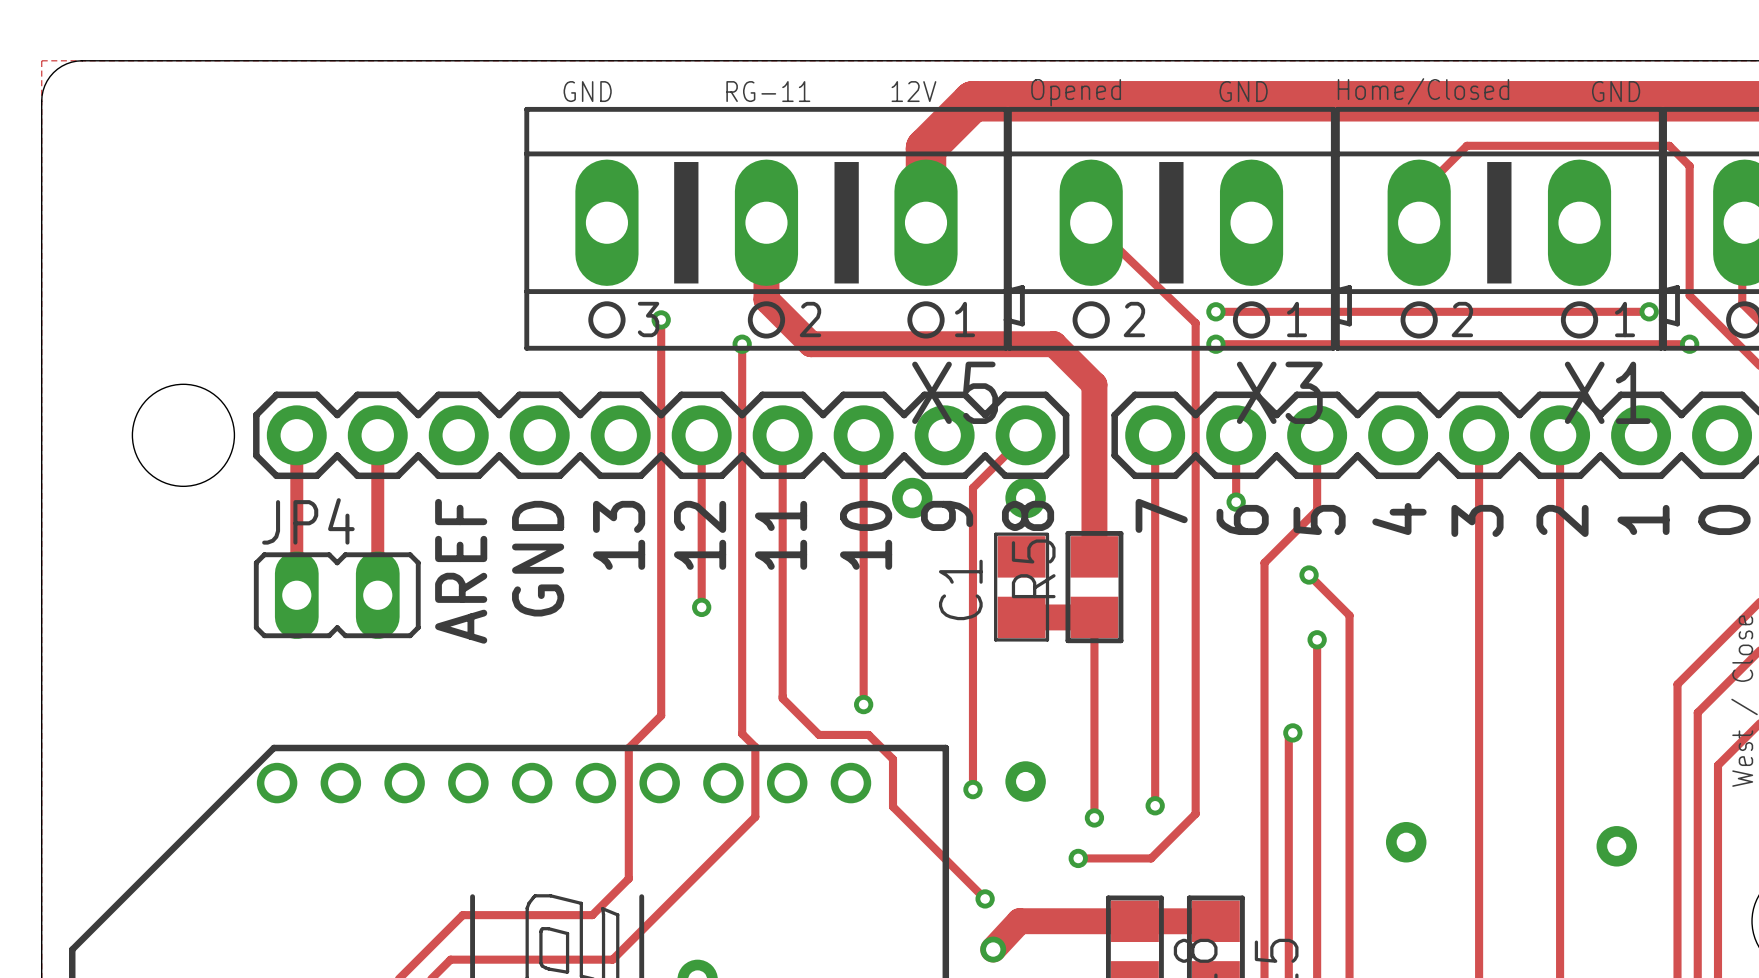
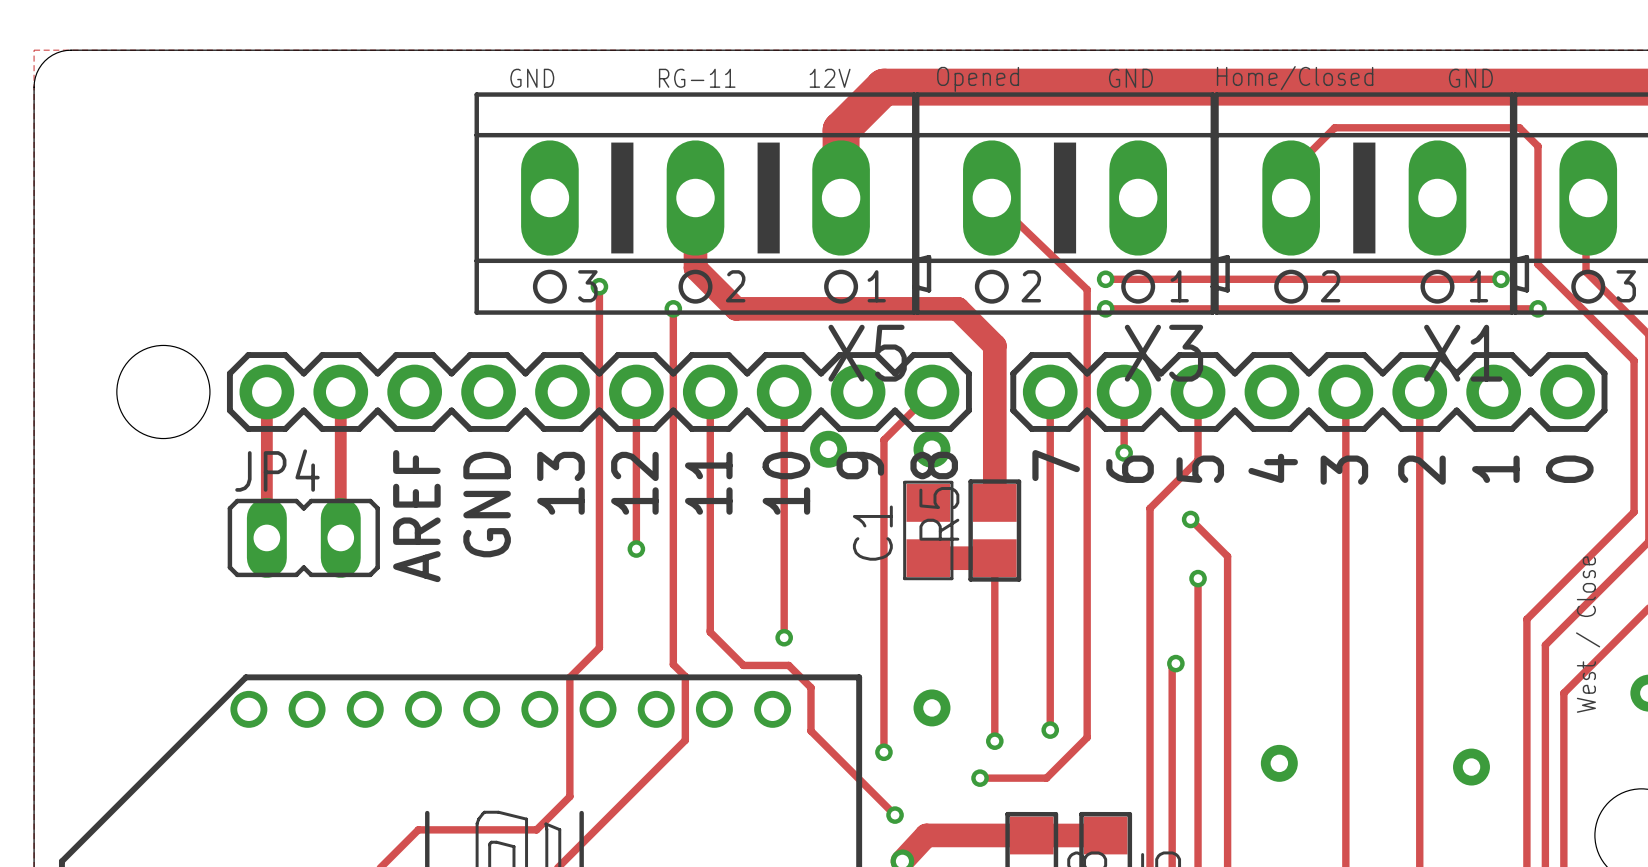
track: none -> (883, 715) (883, 752)
via position: (972, 789) -> (883, 752)

